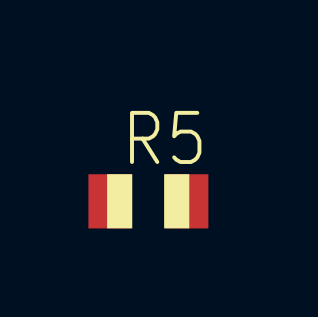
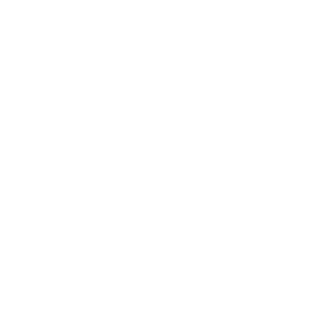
R5: (148, 201) -> none

